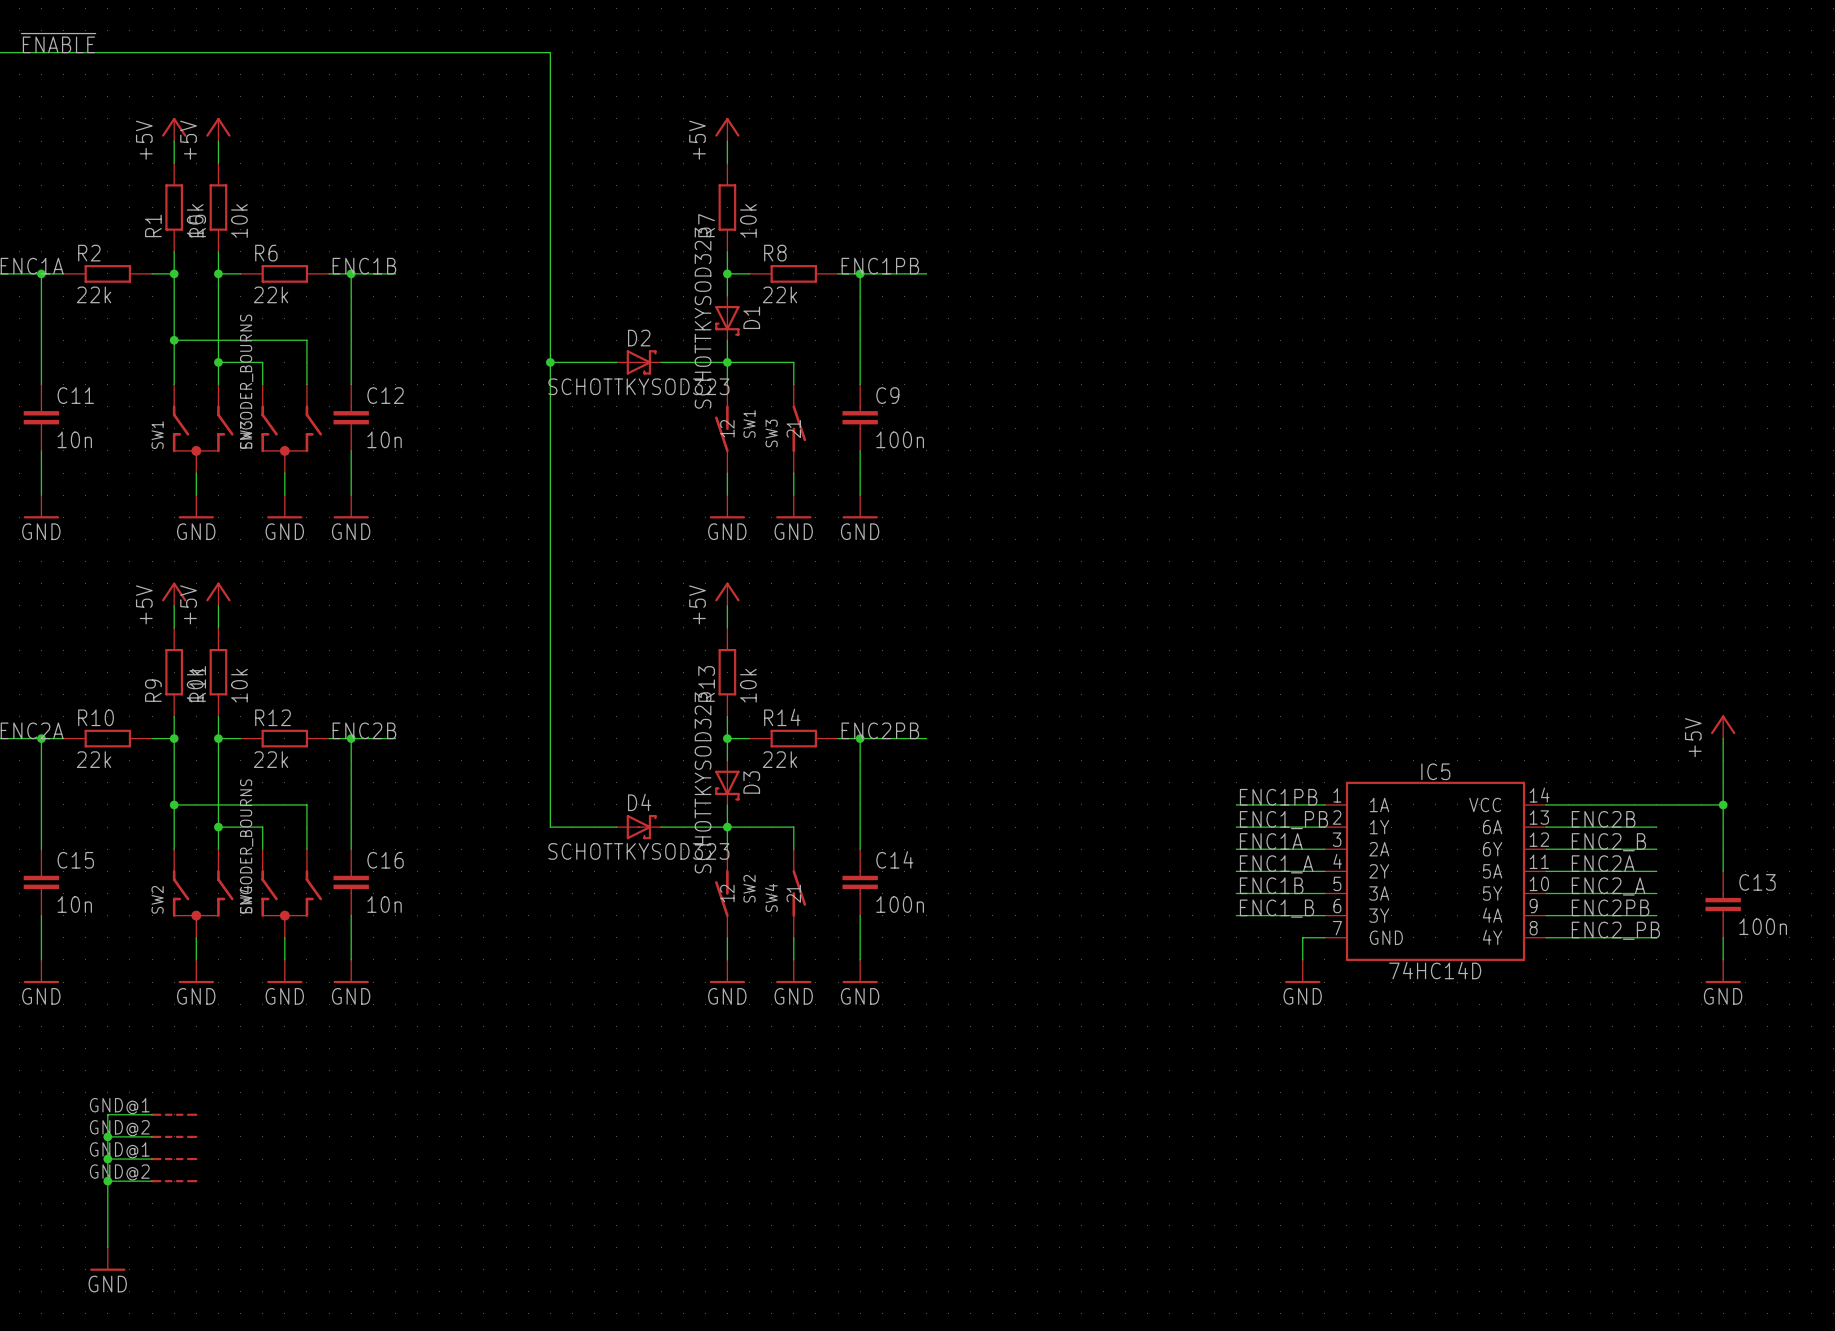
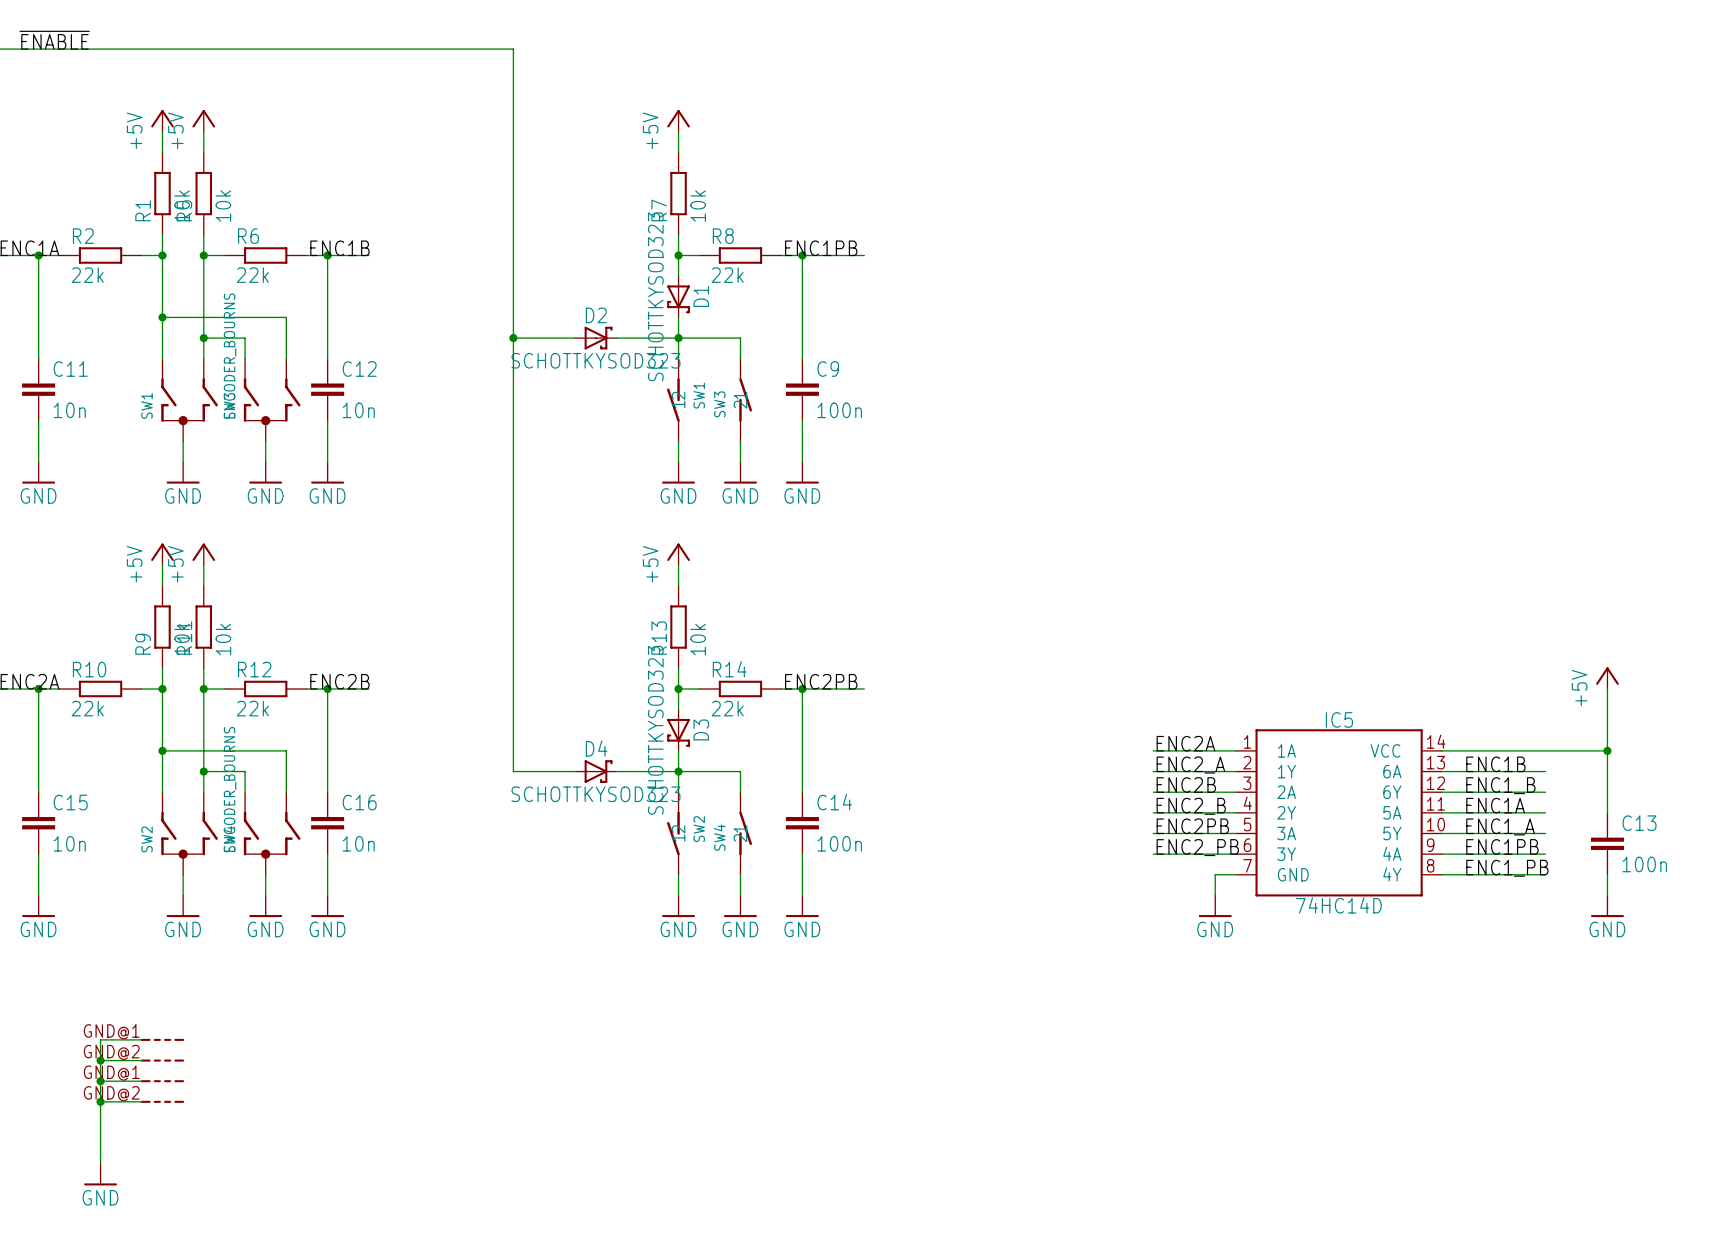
label: ENC1PB (1278, 797) -> ENC2A (1185, 743)
label: ENC2B (1603, 819) -> ENC1B (1495, 764)
label: ENC1_PB (1283, 820) -> ENC2_A (1190, 765)
label: ENC1A (1271, 841) -> ENC2B (1186, 784)
label: ENC2_B (1608, 842) -> ENC1_B (1500, 785)
label: ENC2A (1603, 863) -> ENC1A (1495, 805)
label: ENC1_A (1276, 864) -> ENC2_B (1191, 806)
label: ENC1B (1271, 885) -> ENC2PB (1192, 826)
label: ENC2_A (1608, 886) -> ENC1_A (1500, 826)
label: ENC2PB (1610, 907) -> ENC1PB (1502, 846)
label: ENC1_B (1276, 908) -> ENC2_PB (1197, 847)
label: ENC2_PB (1615, 930) -> ENC1_PB (1507, 868)

